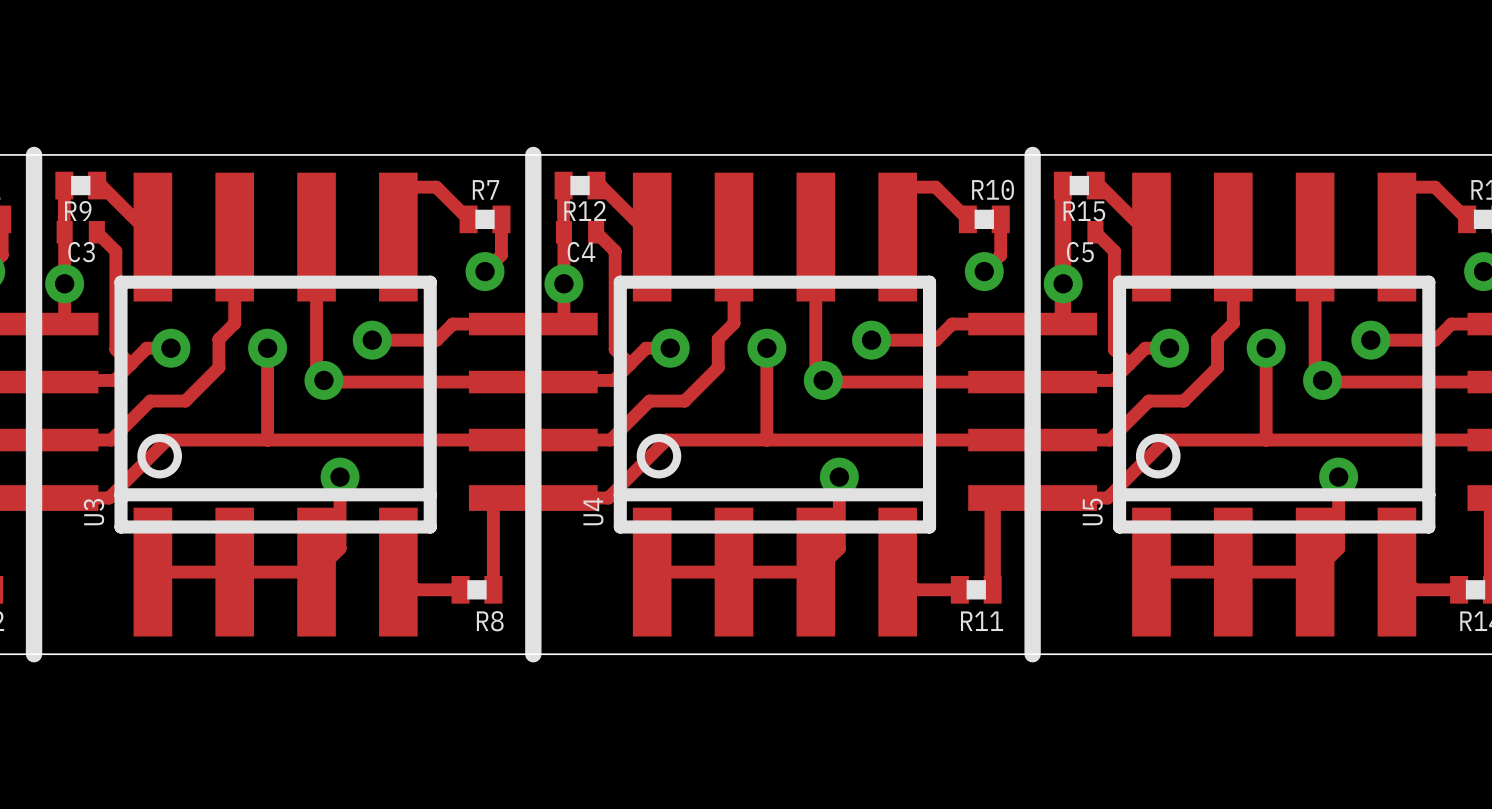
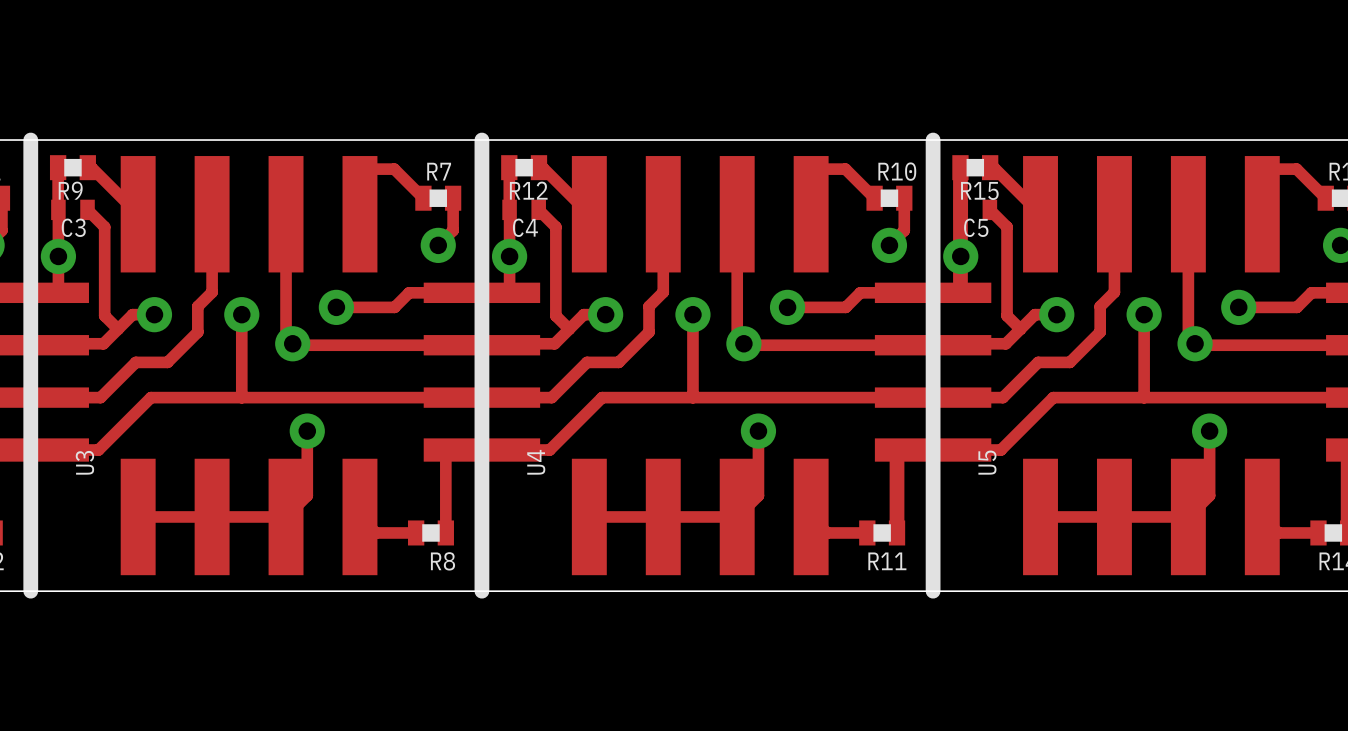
U3 footprint: [114, 172, 437, 637] -> [120, 156, 378, 576]
U4 footprint: [613, 172, 937, 637] -> [571, 156, 829, 576]
U5 footprint: [1113, 172, 1436, 637] -> [1023, 156, 1280, 576]

